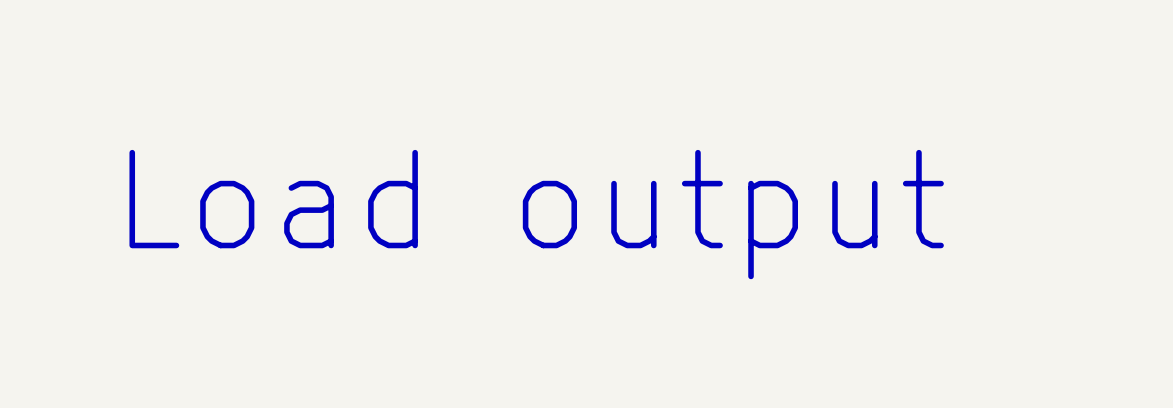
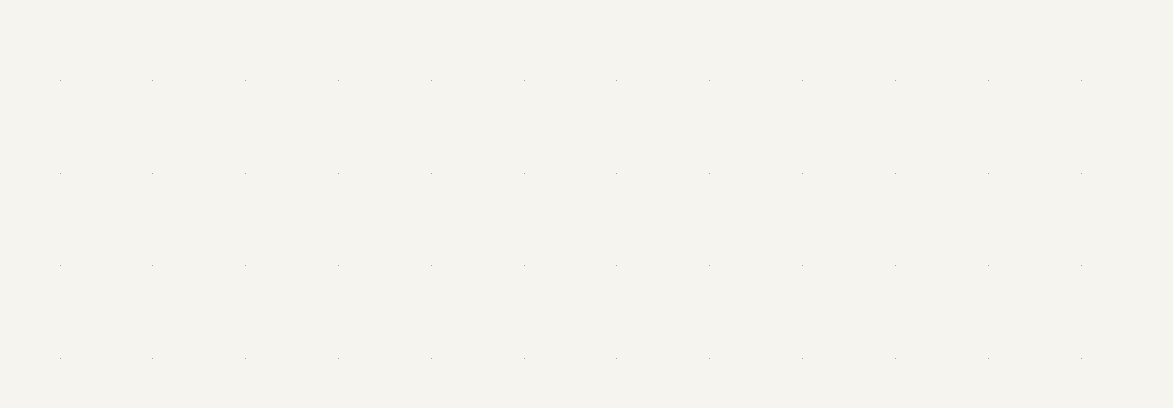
text: Load output (536, 214) -> none

